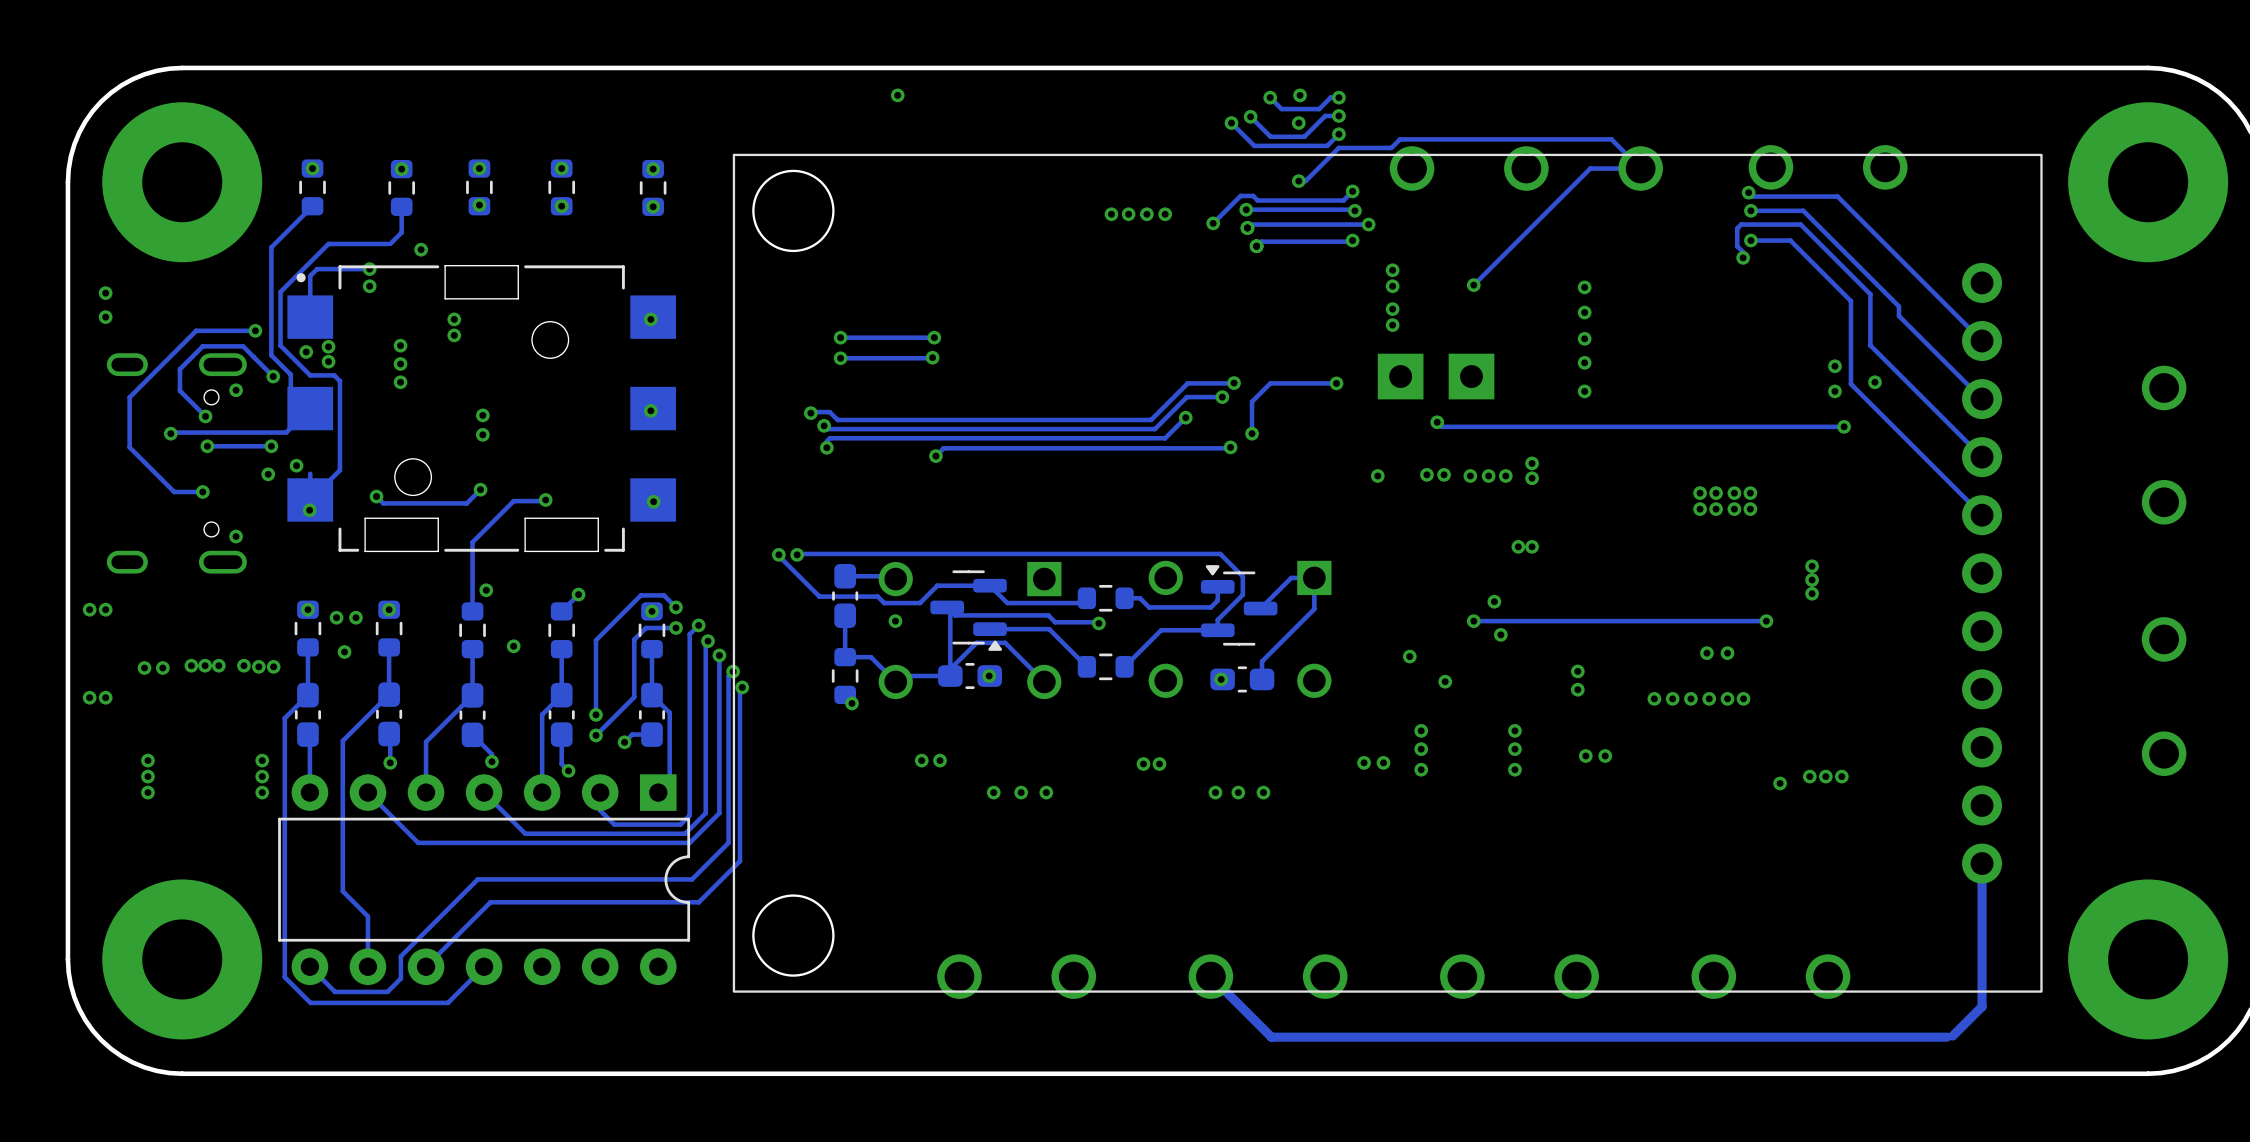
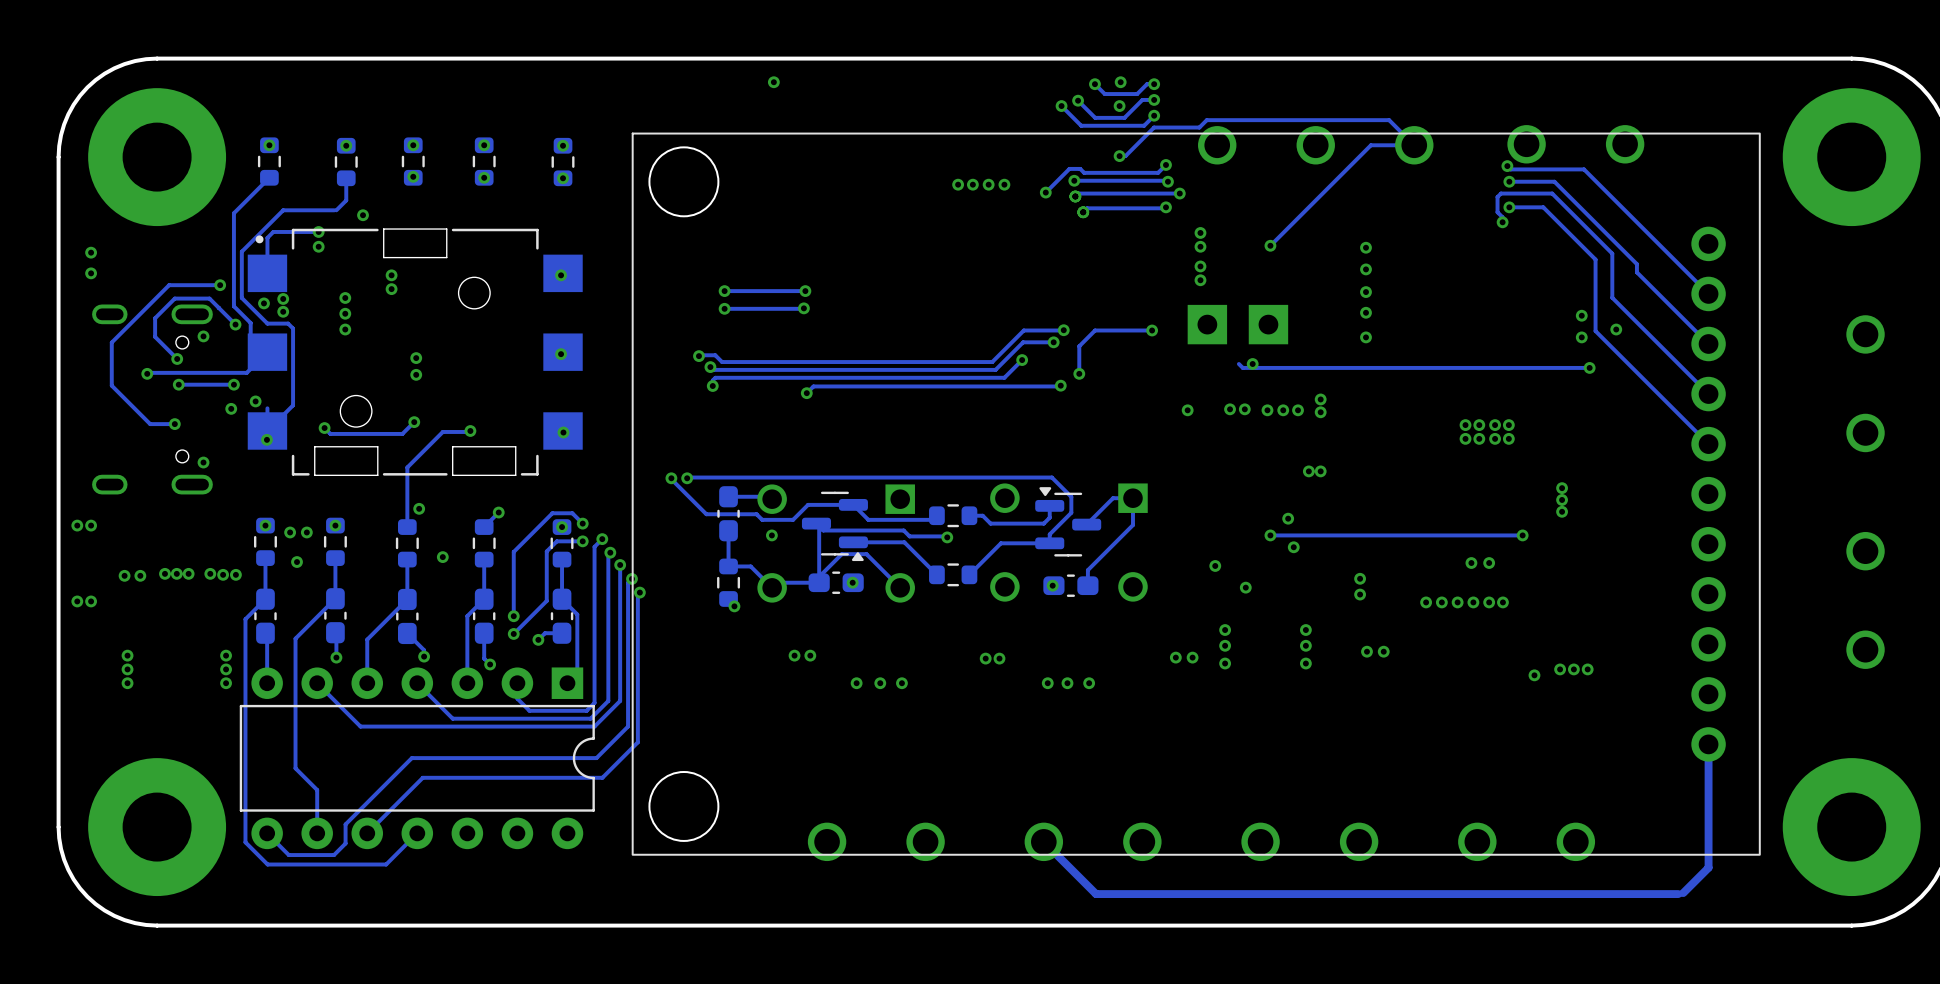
via position: (1437, 422) -> (1252, 364)

